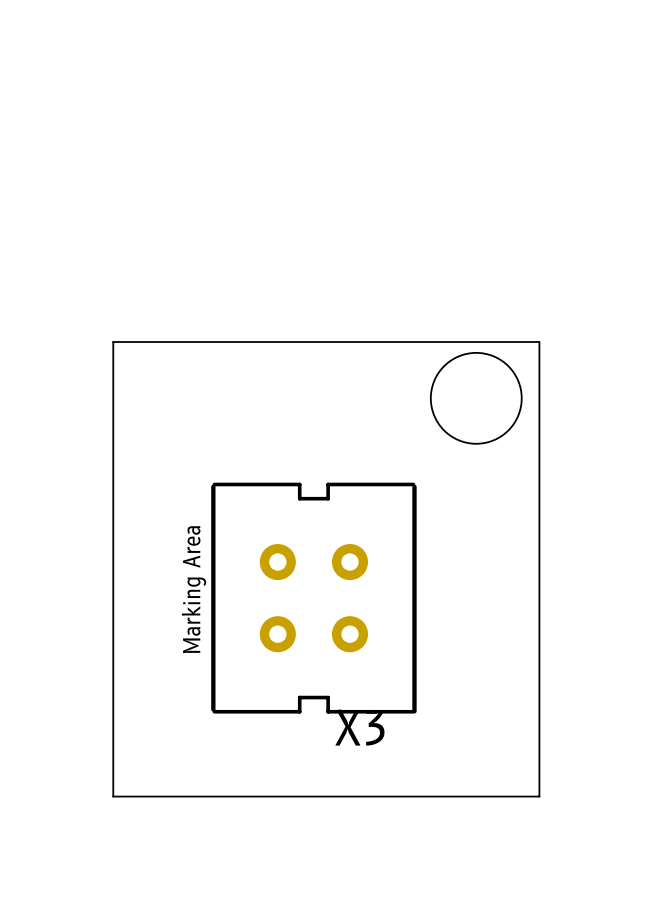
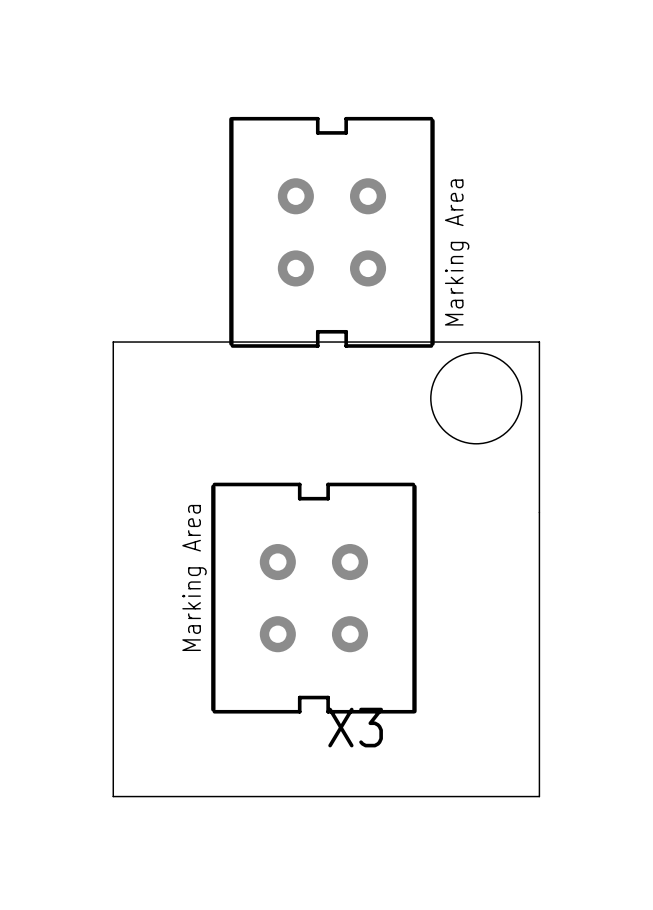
part: none -> (331, 232)

